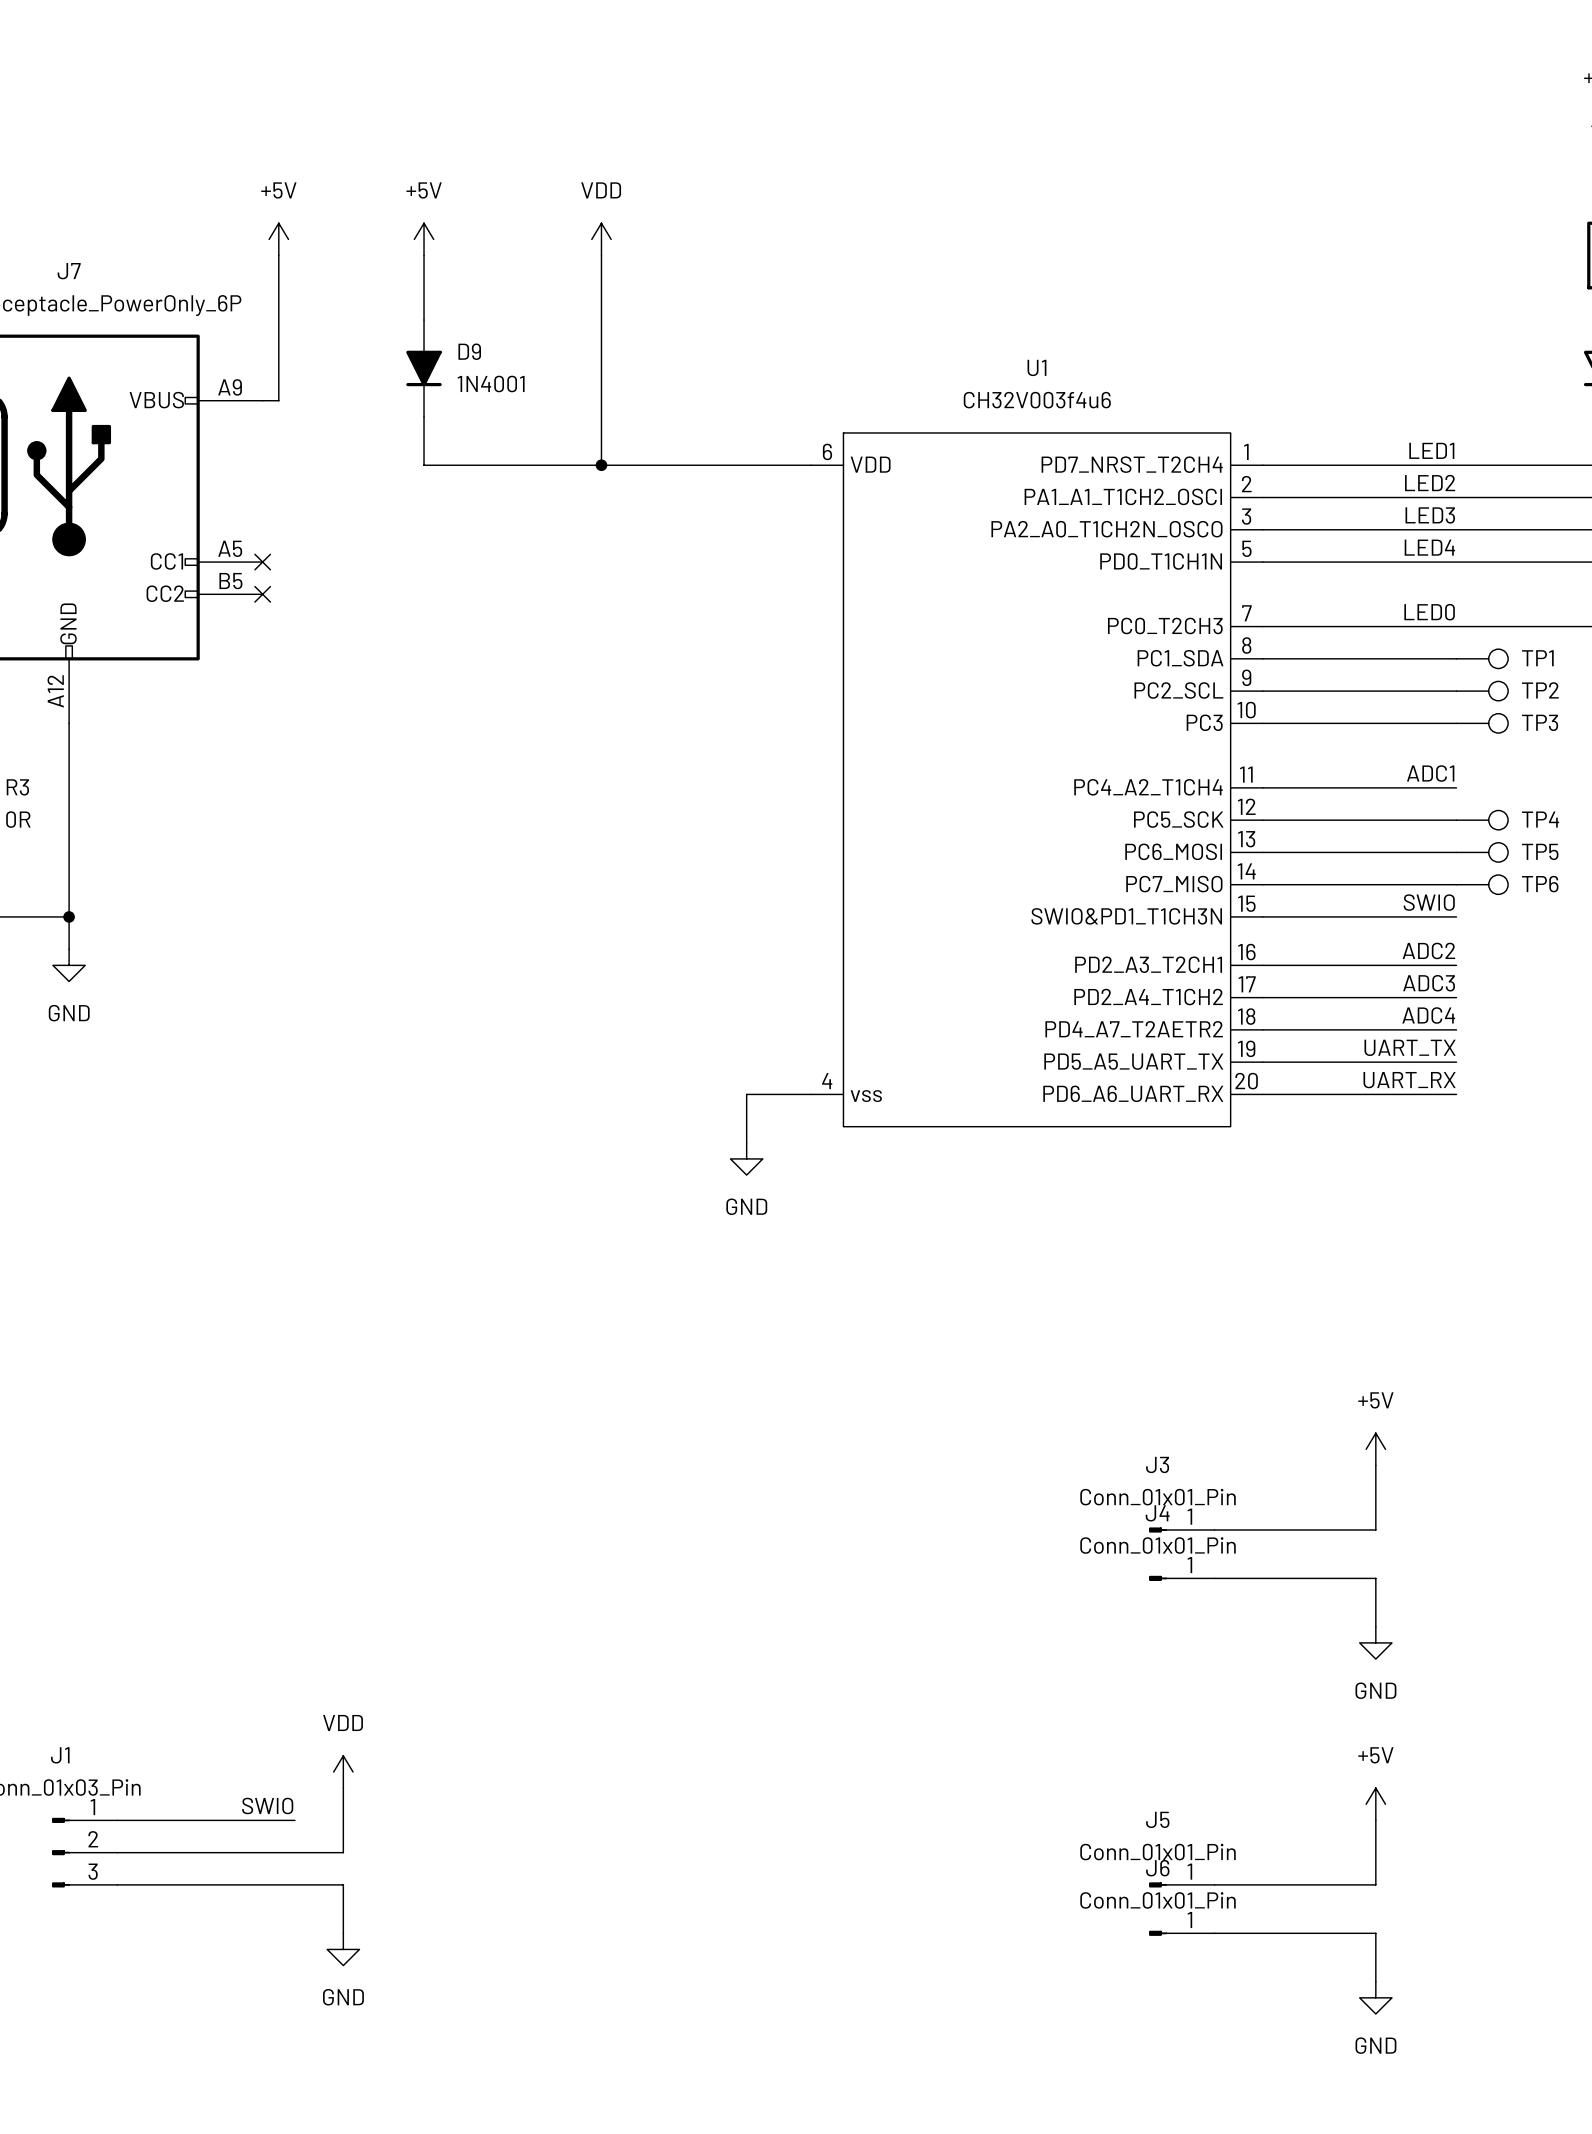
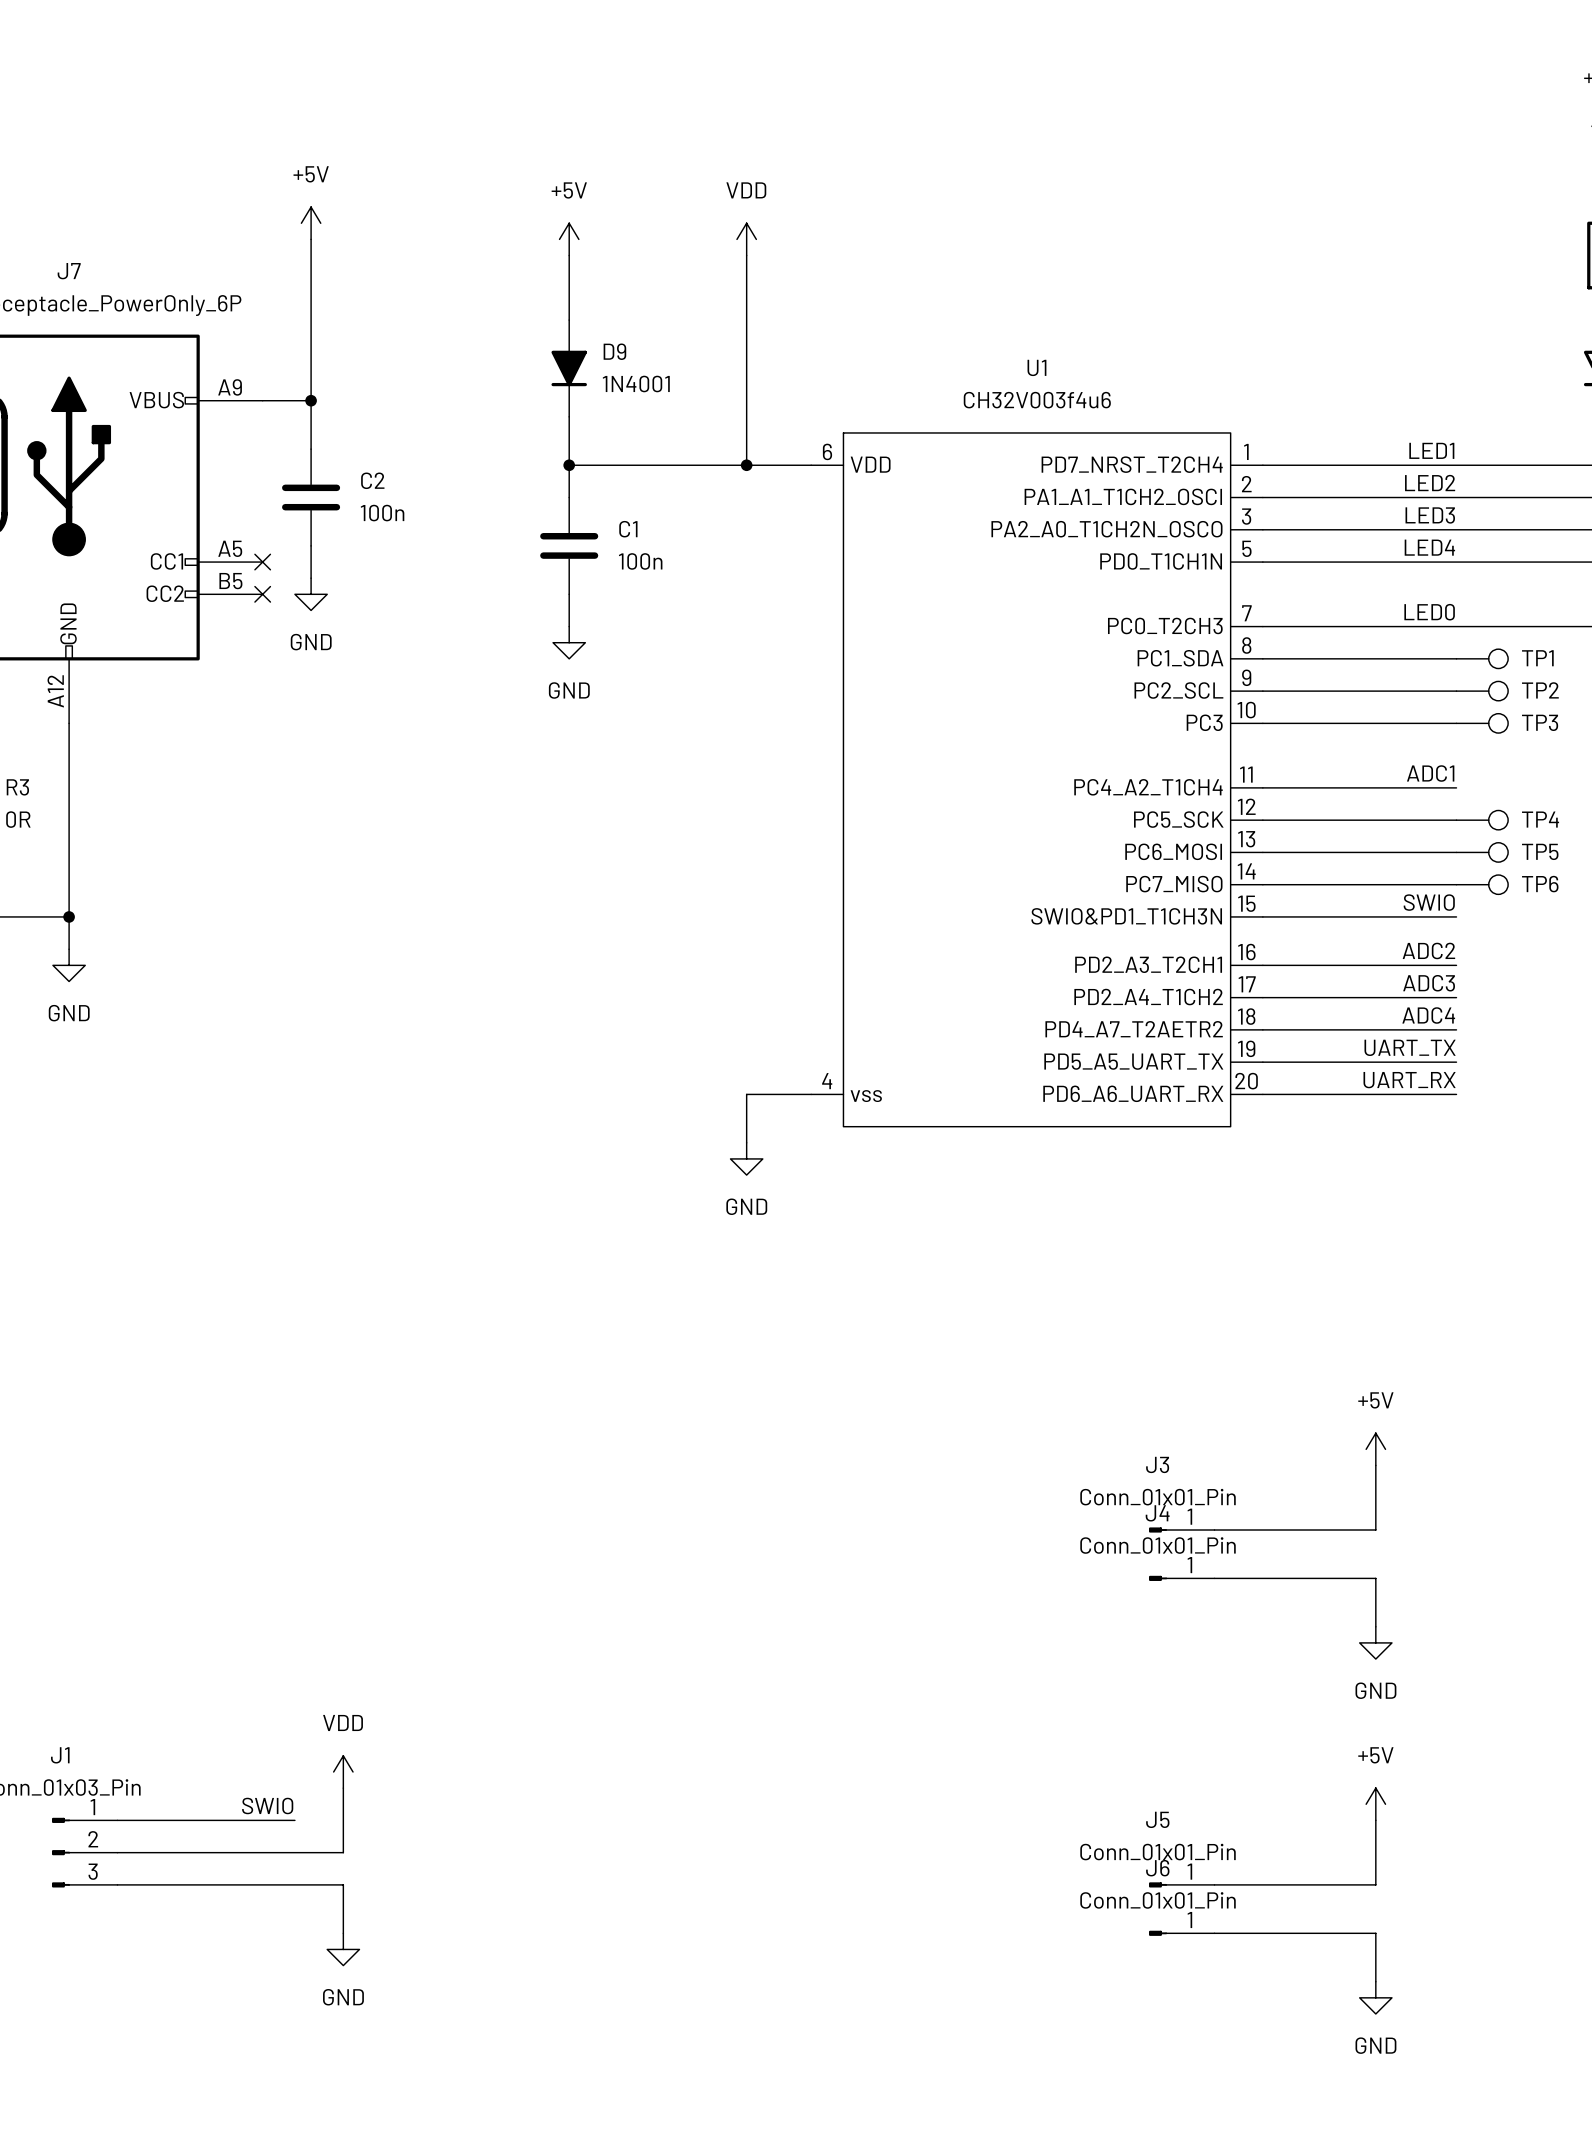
power symbol position: +5V (278, 239) -> +5V (311, 223)
wire: none -> (311, 239) (311, 449)
power symbol: +5V (424, 239) -> none
power symbol: none -> +5V (569, 239)
power symbol position: VDD (601, 239) -> VDD (746, 239)
wire: (278, 255) (278, 400) -> (311, 400) (278, 400)
wire: (424, 255) (424, 320) -> (569, 255) (569, 320)
wire: (601, 255) (601, 465) -> (746, 255) (746, 465)
D9 position: (424, 368) -> (569, 368)
junction: none -> (311, 400)
wire: (424, 416) (424, 465) (569, 465) -> none
wire: none -> (569, 416) (569, 497)
junction position: (601, 465) -> (569, 465)
junction: none -> (746, 465)
C2: none -> 100n (311, 497)
wire: none -> (311, 545) (311, 578)
C1: none -> 100n (569, 545)
power symbol: none -> GND (311, 594)
wire: none -> (569, 594) (569, 626)
power symbol: none -> GND (569, 642)

